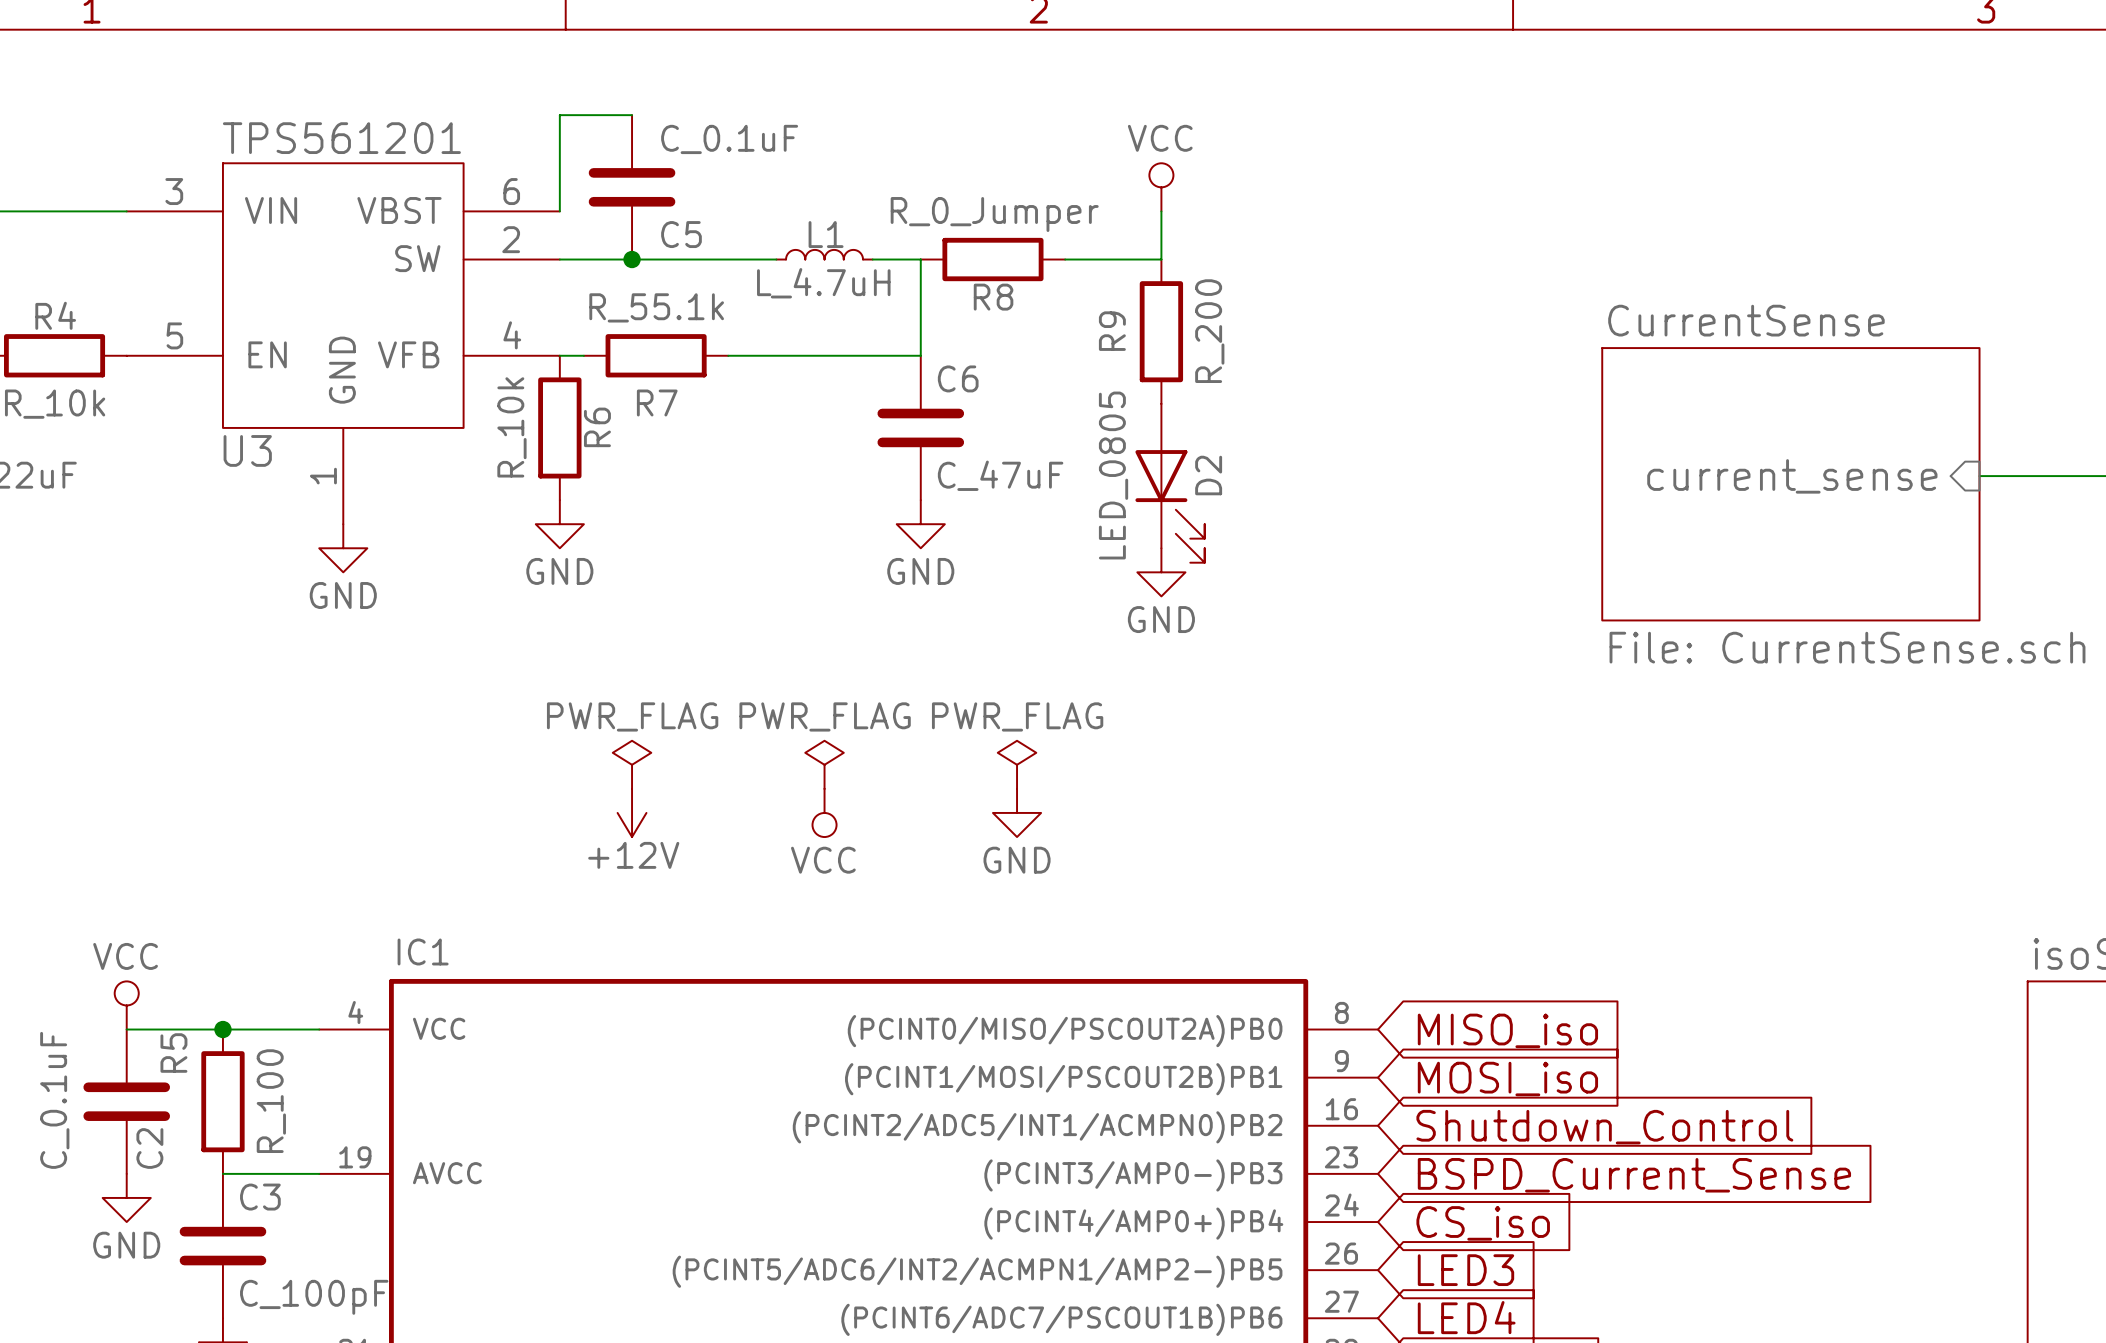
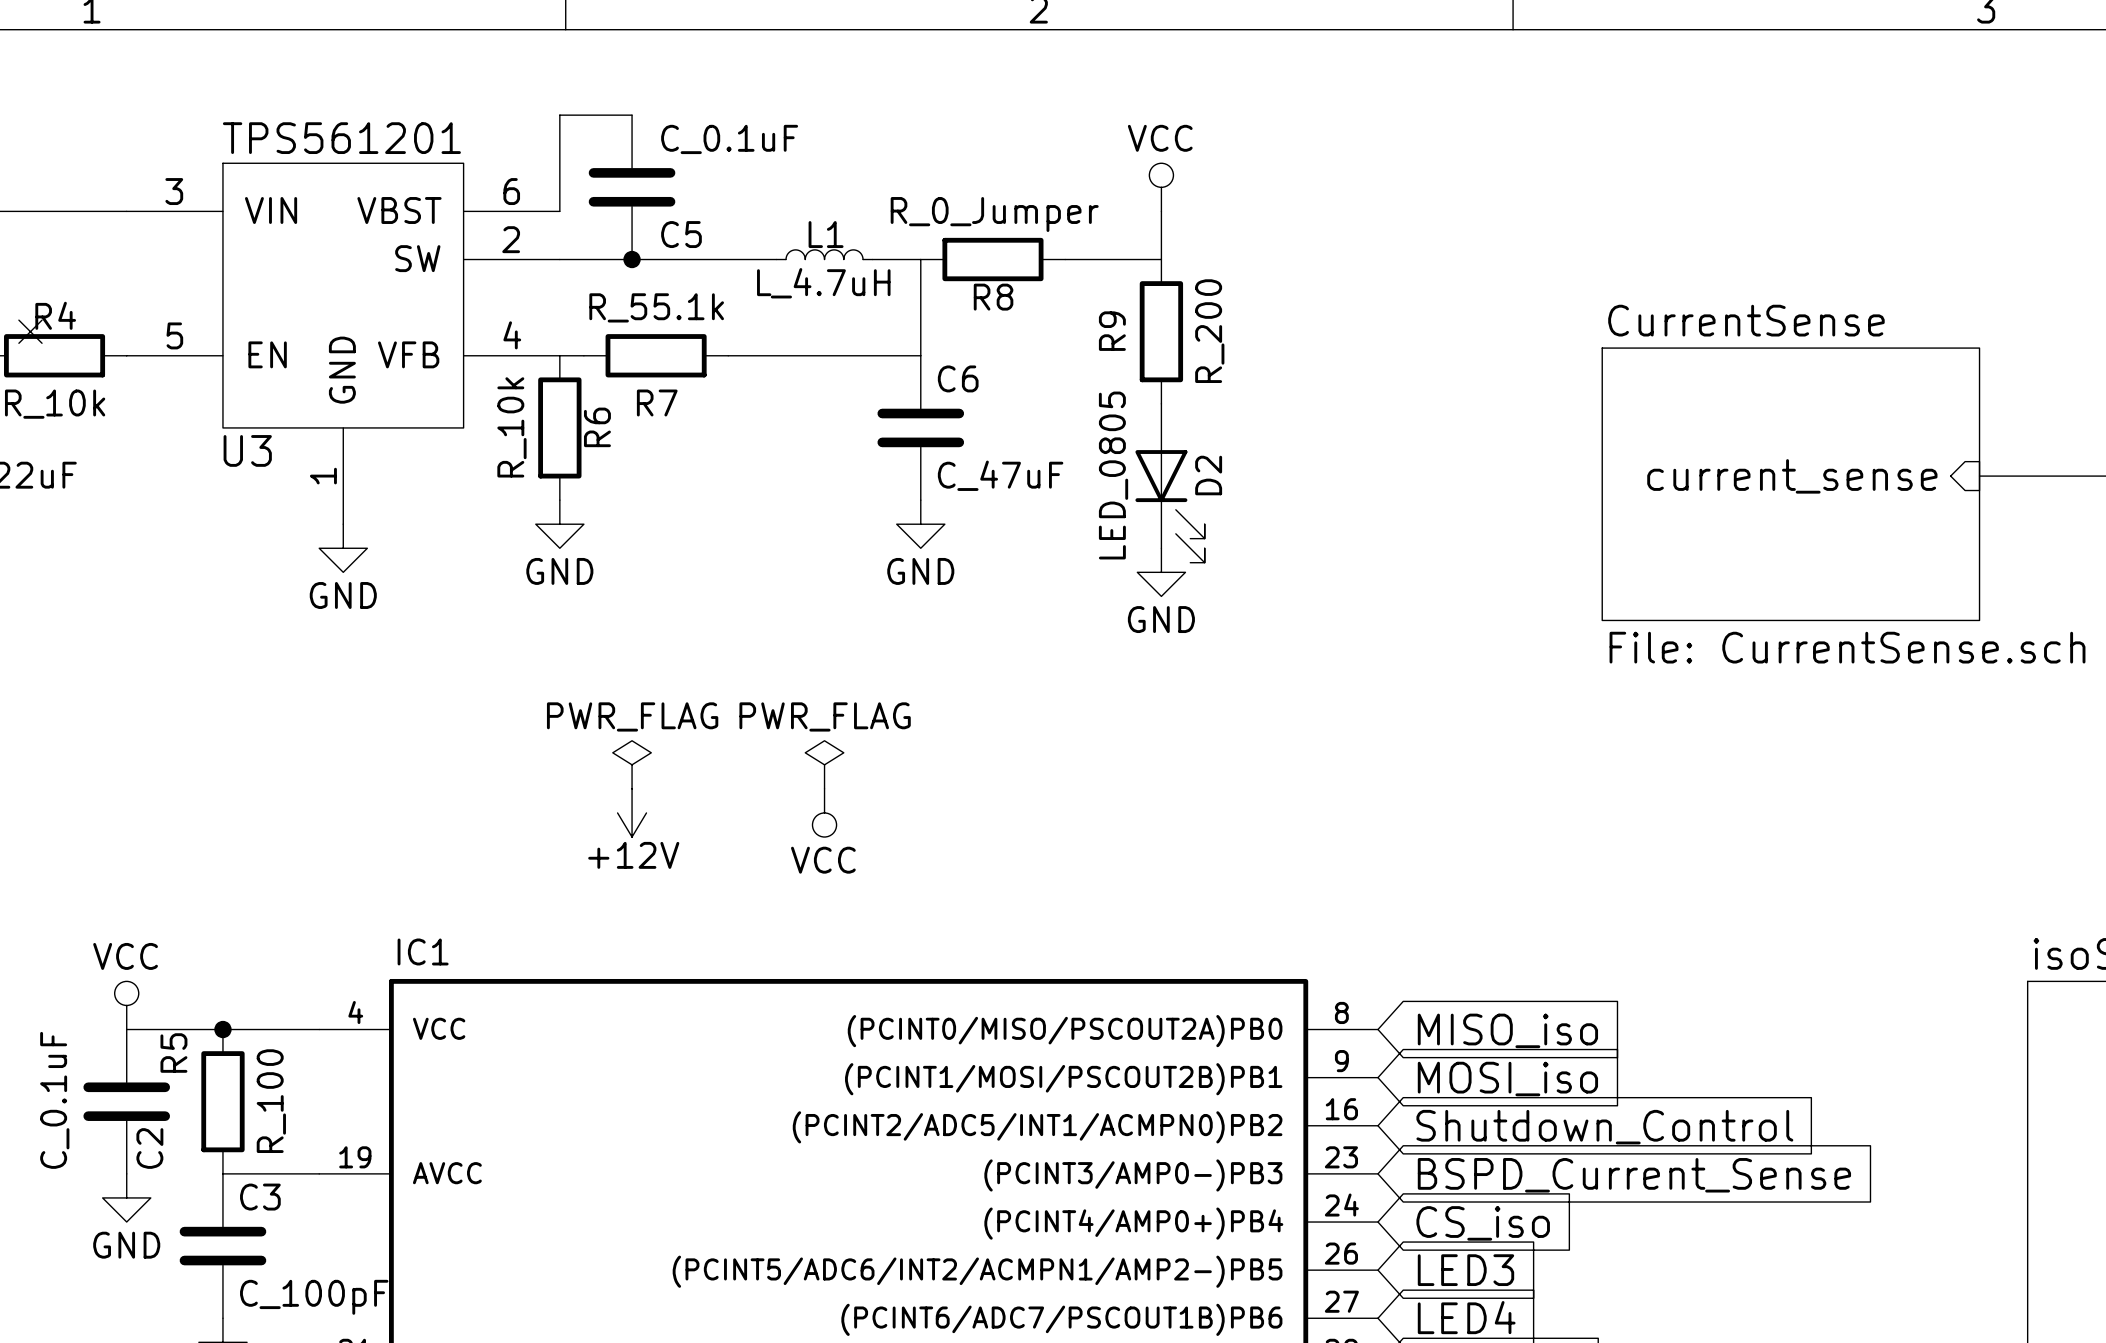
no-connect mark: none -> (30, 331)
power symbol: PWR_FLAG (1017, 764) -> none
power symbol: GND (1017, 812) -> none

